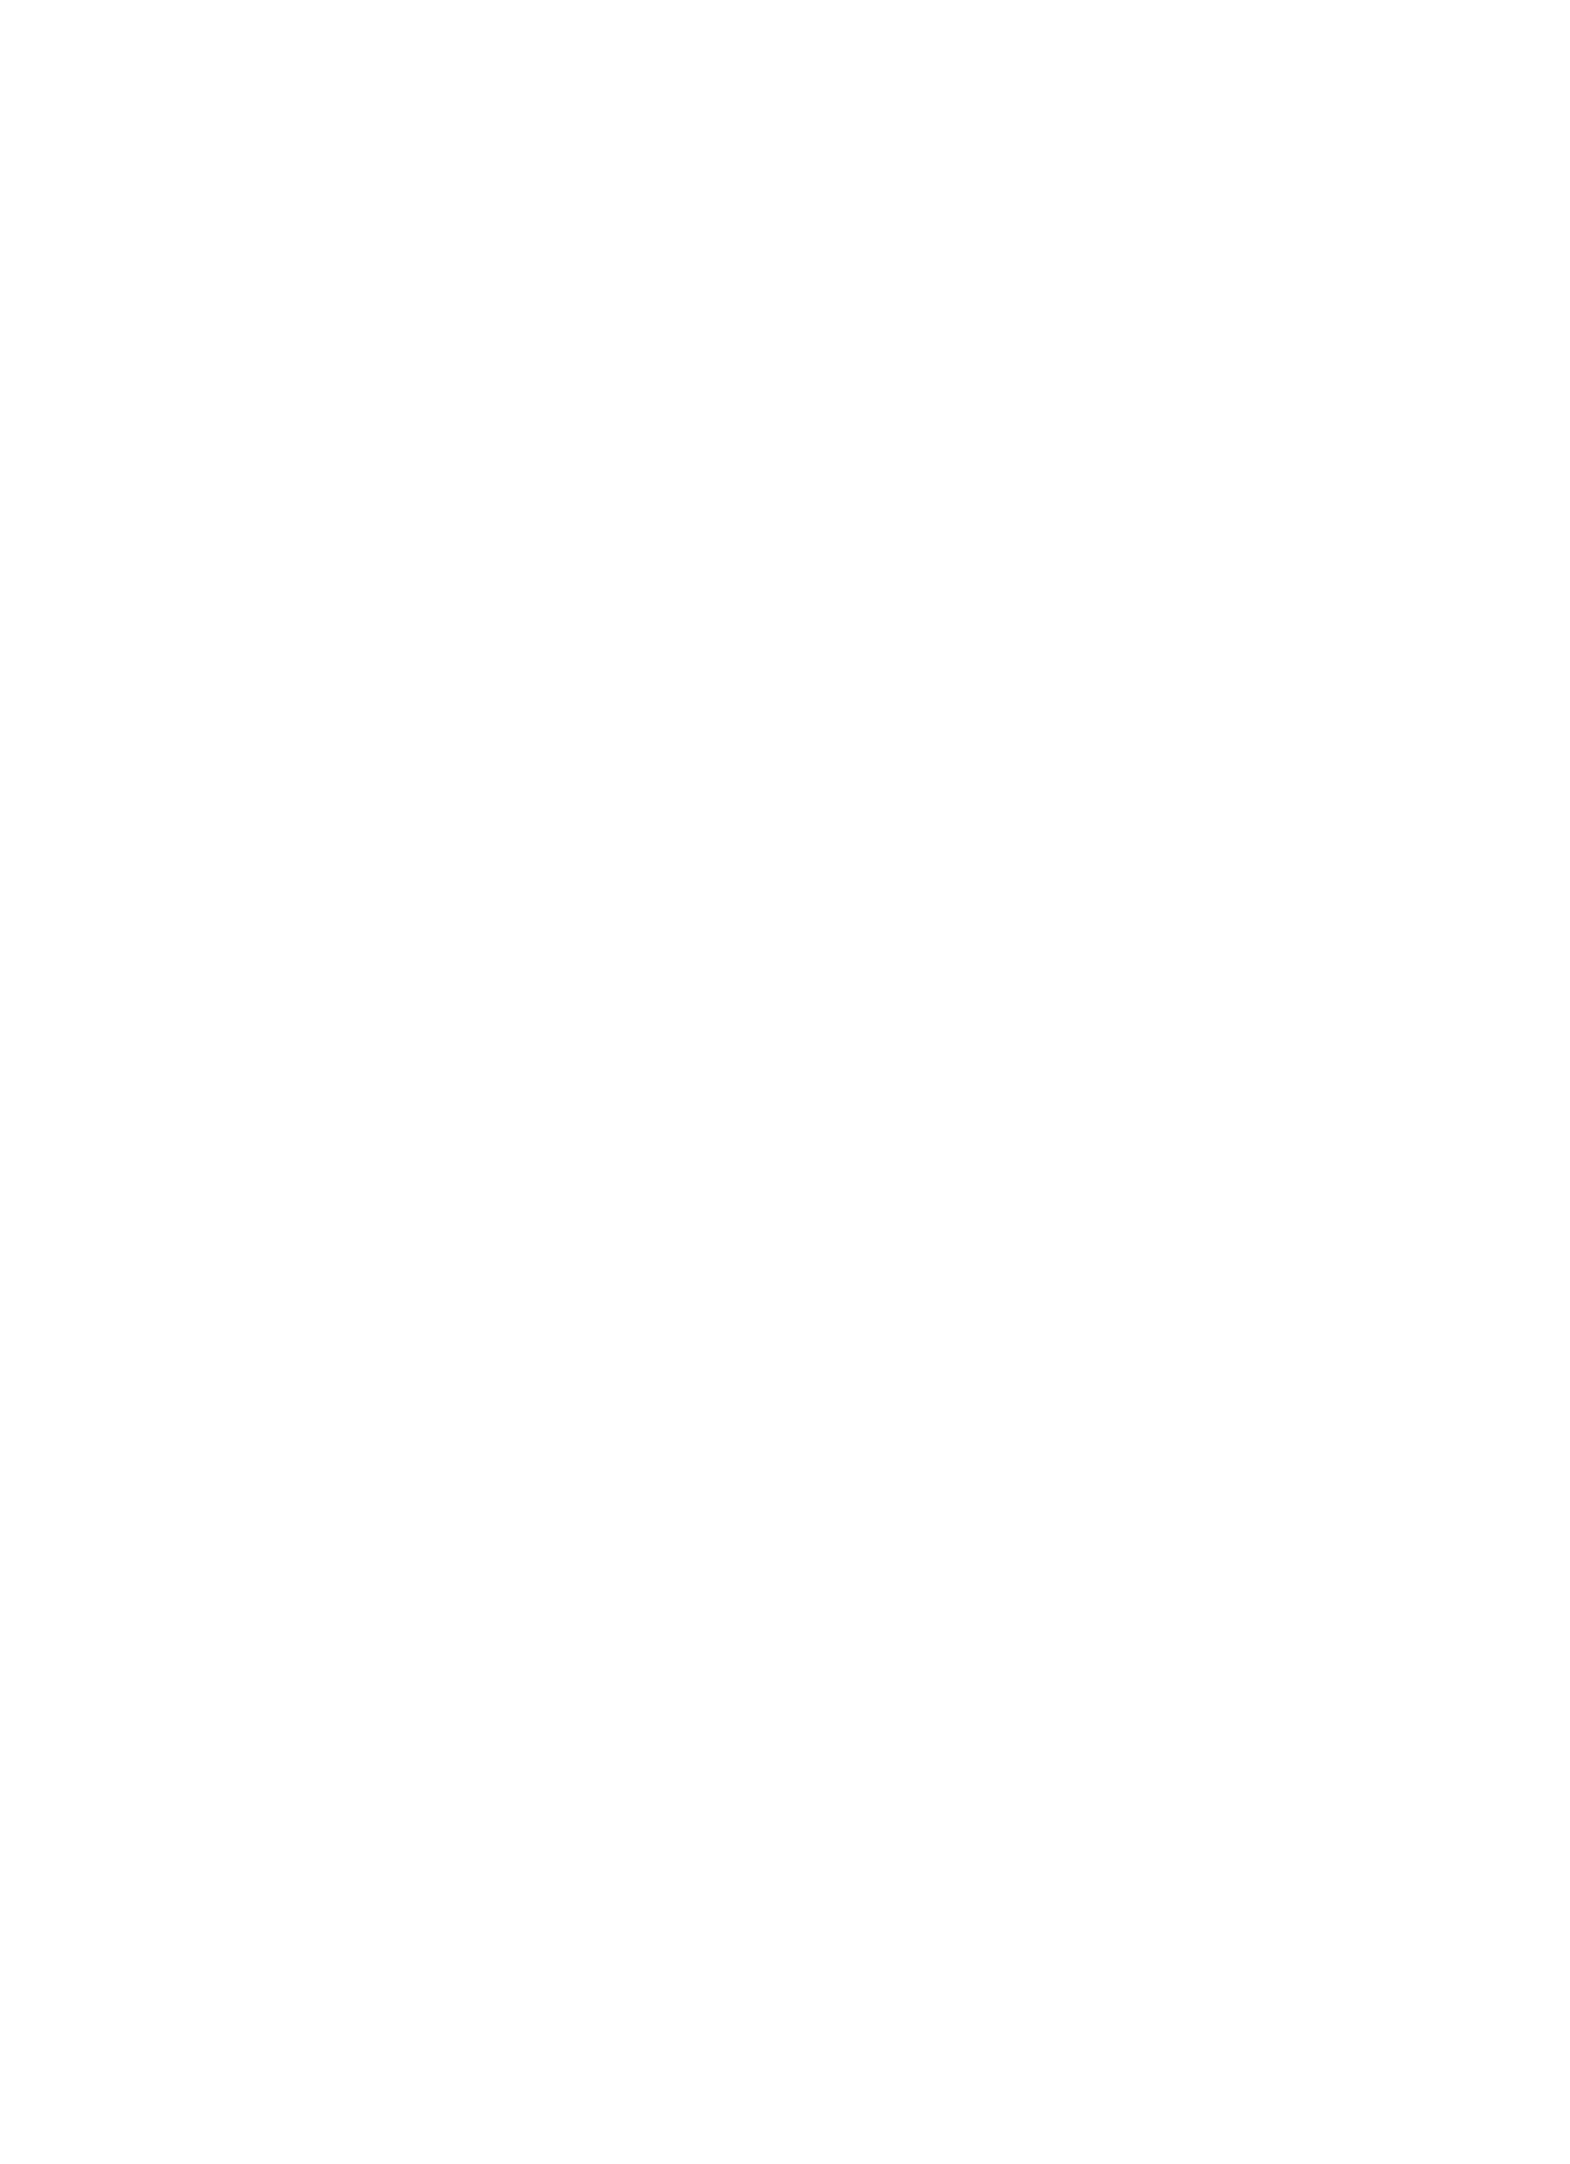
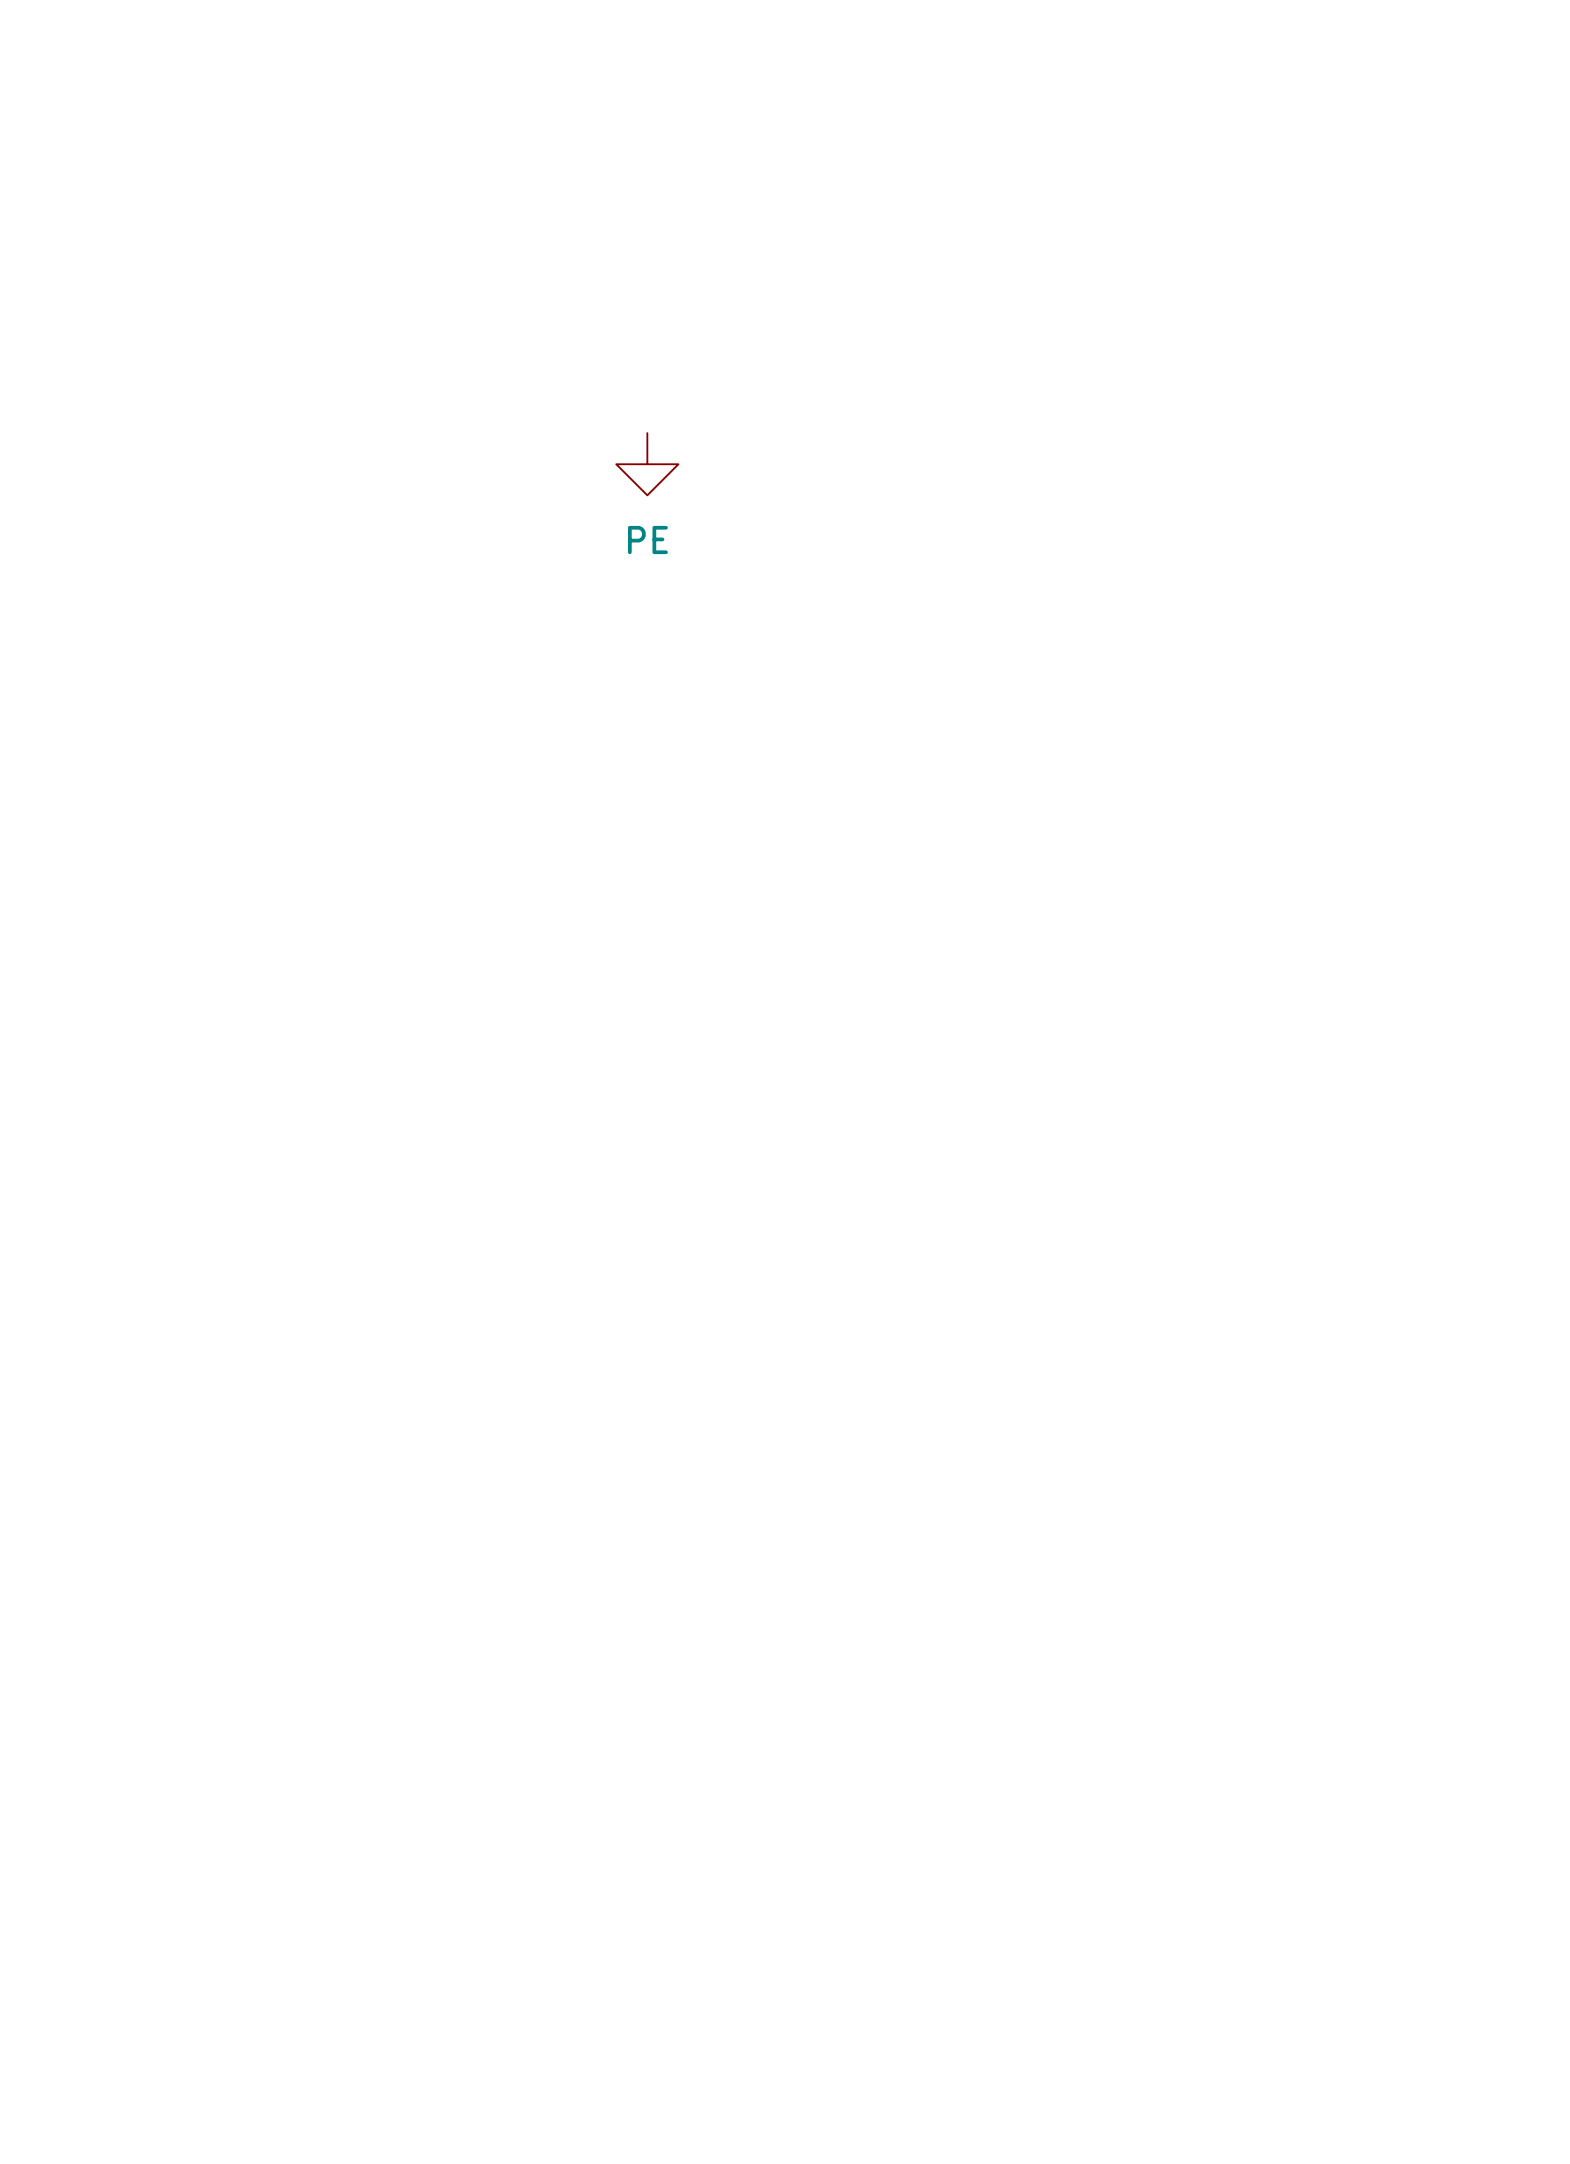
power symbol: none -> PE (647, 464)

